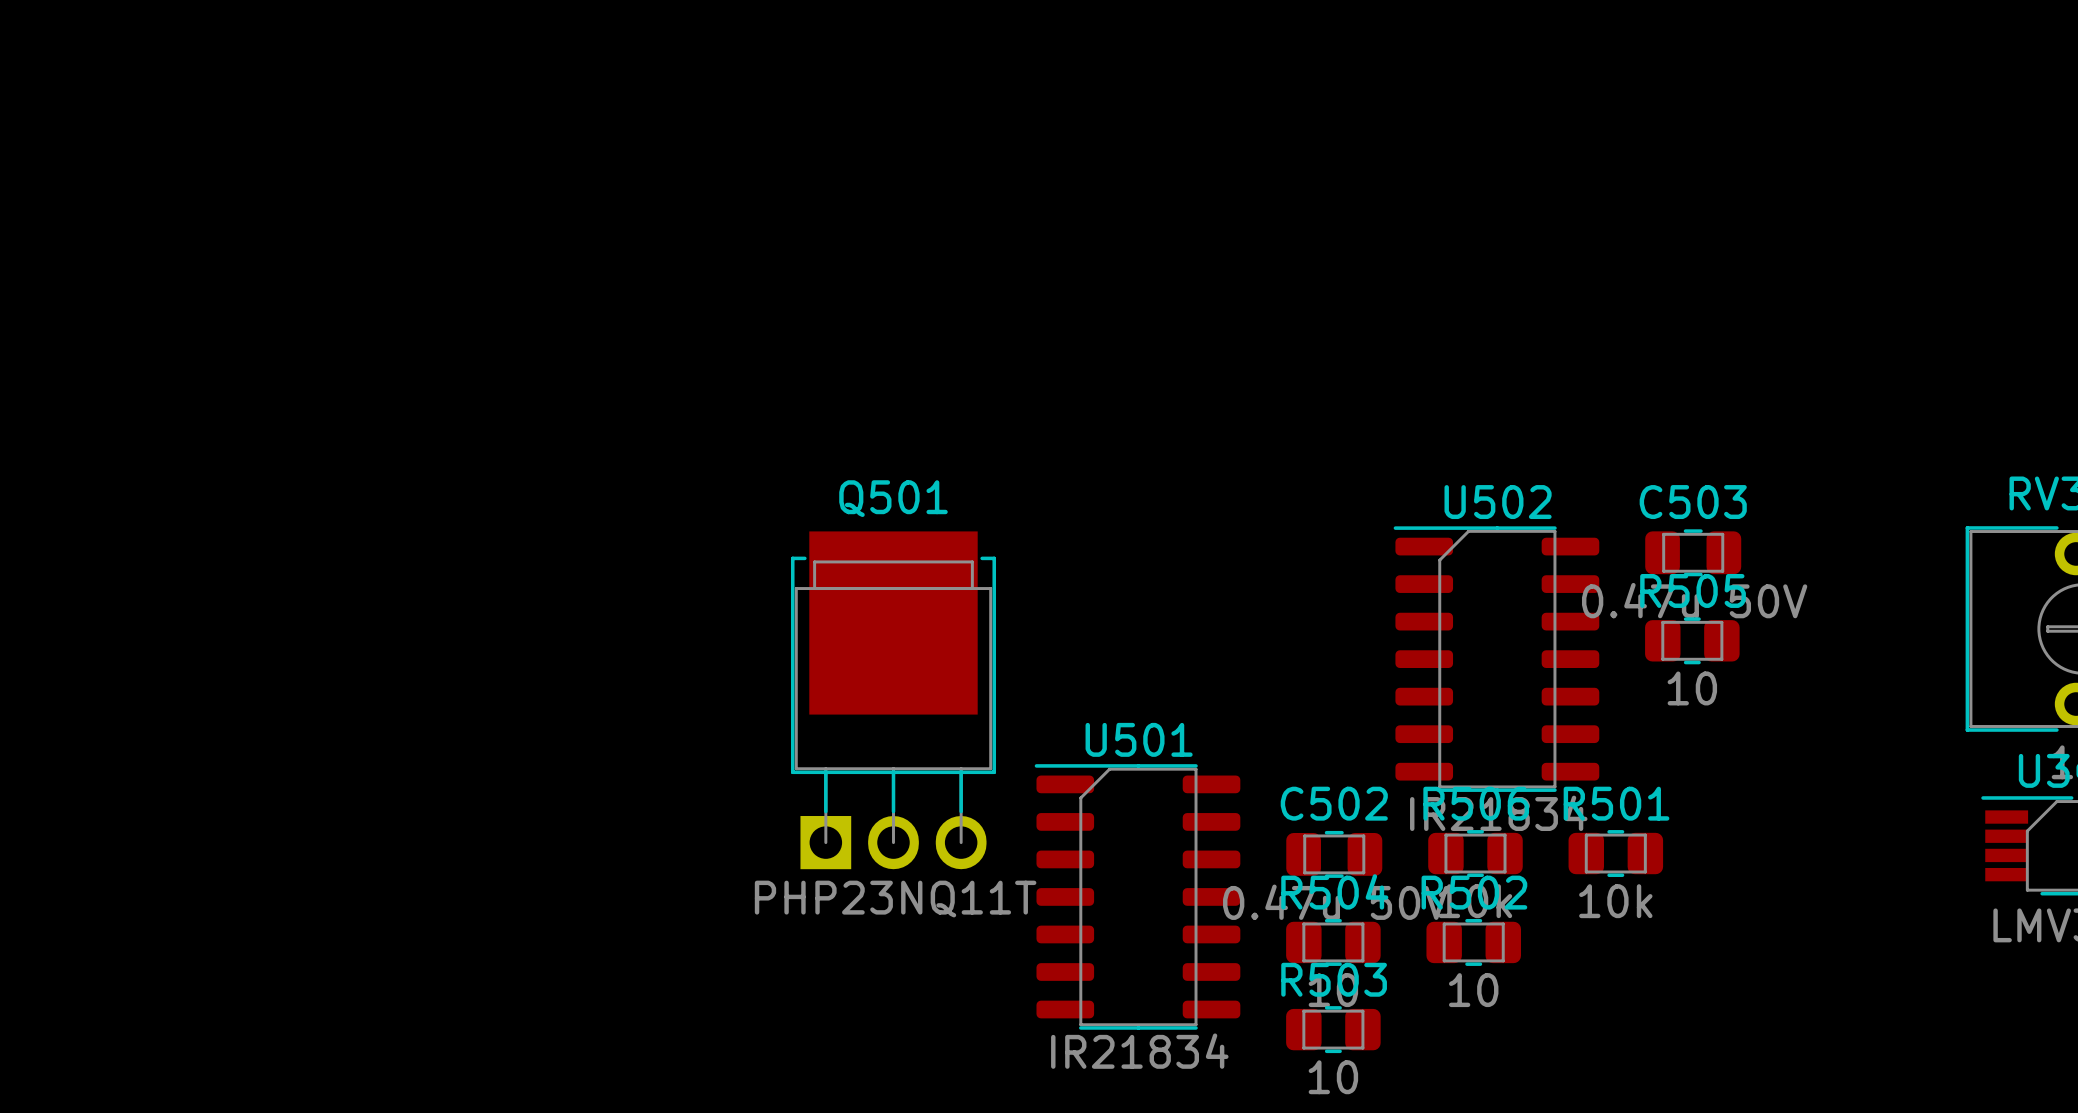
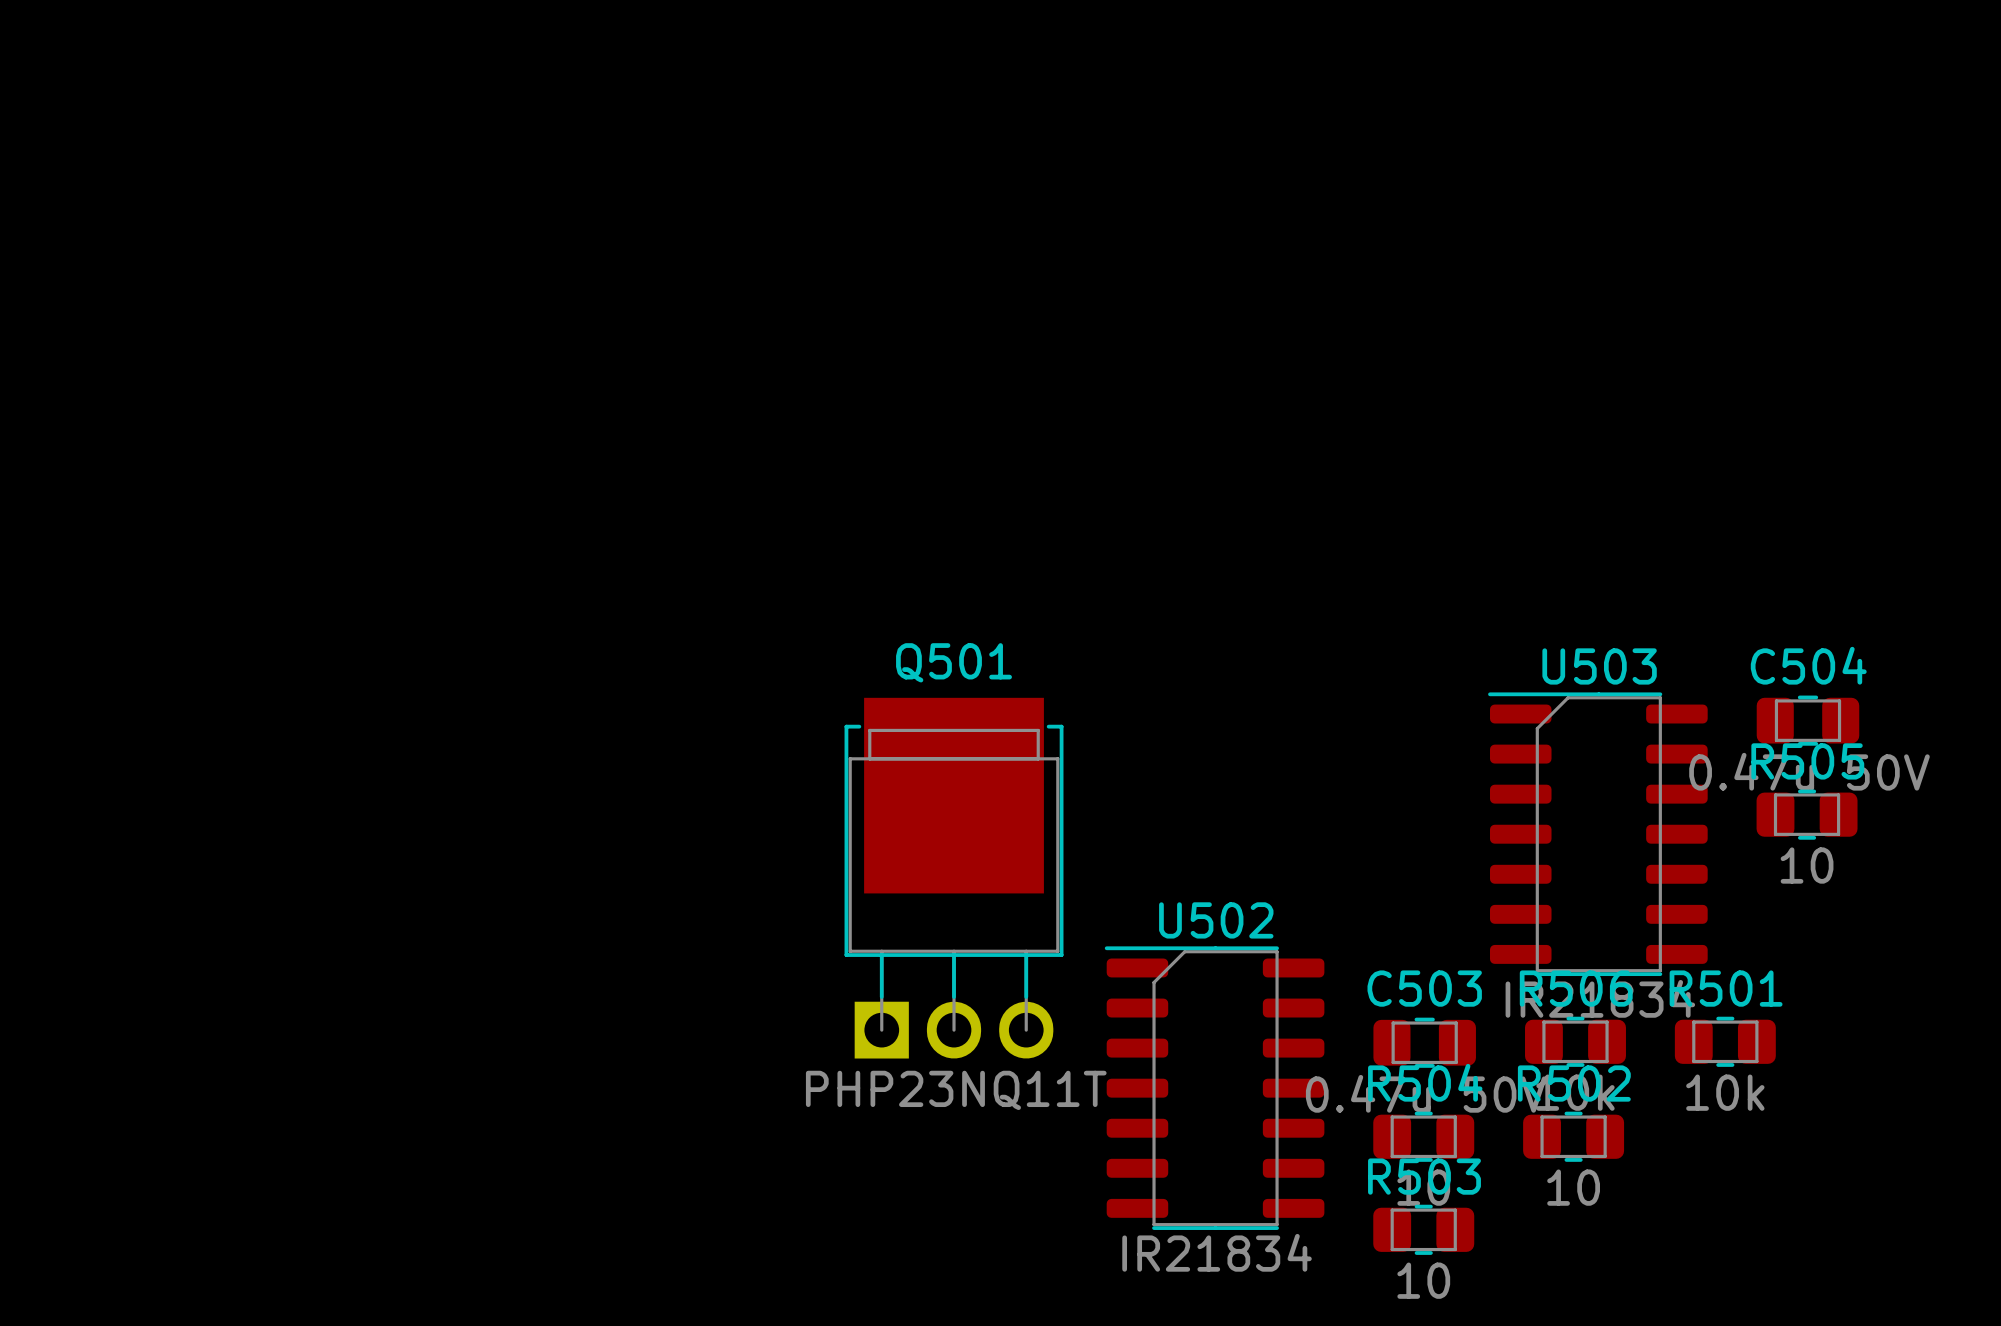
U502 name: U502 (1498, 502) -> U503 (1599, 666)
C503 name: C503 (1693, 502) -> C504 (1808, 665)
U501 name: U501 (1139, 739) -> U502 (1216, 920)
C502 name: C502 (1334, 803) -> C503 (1424, 988)

